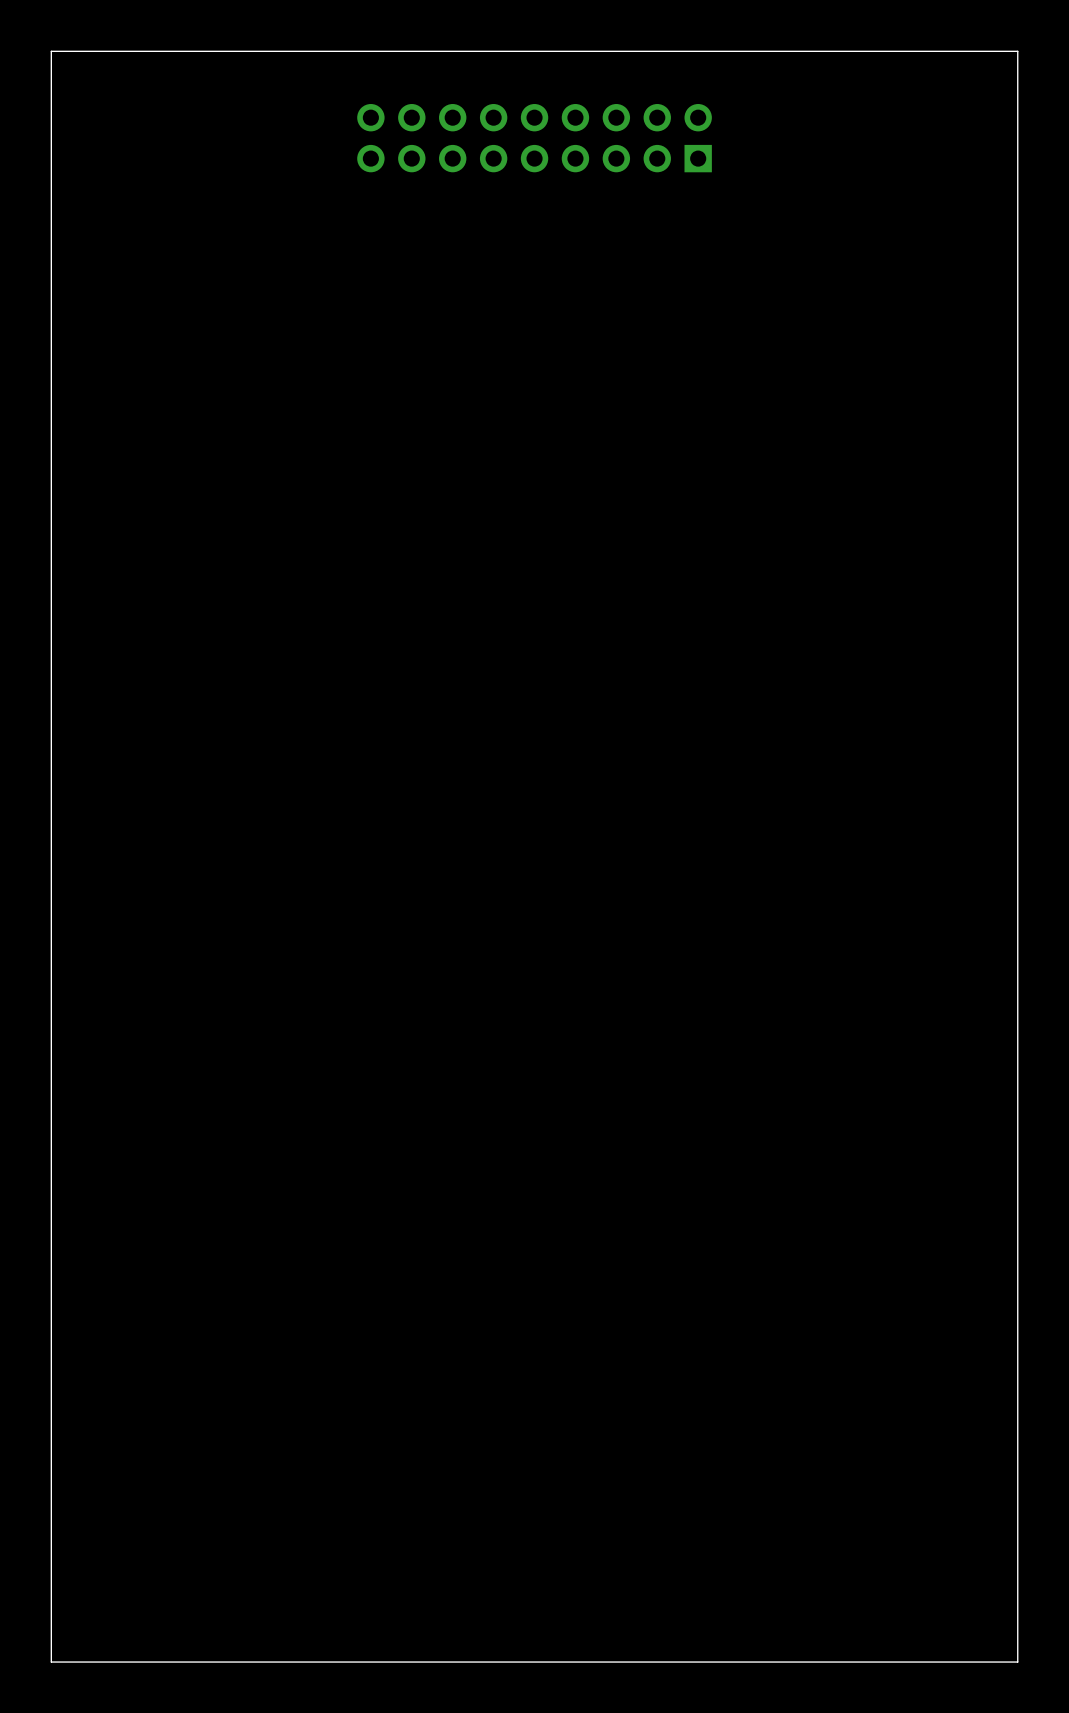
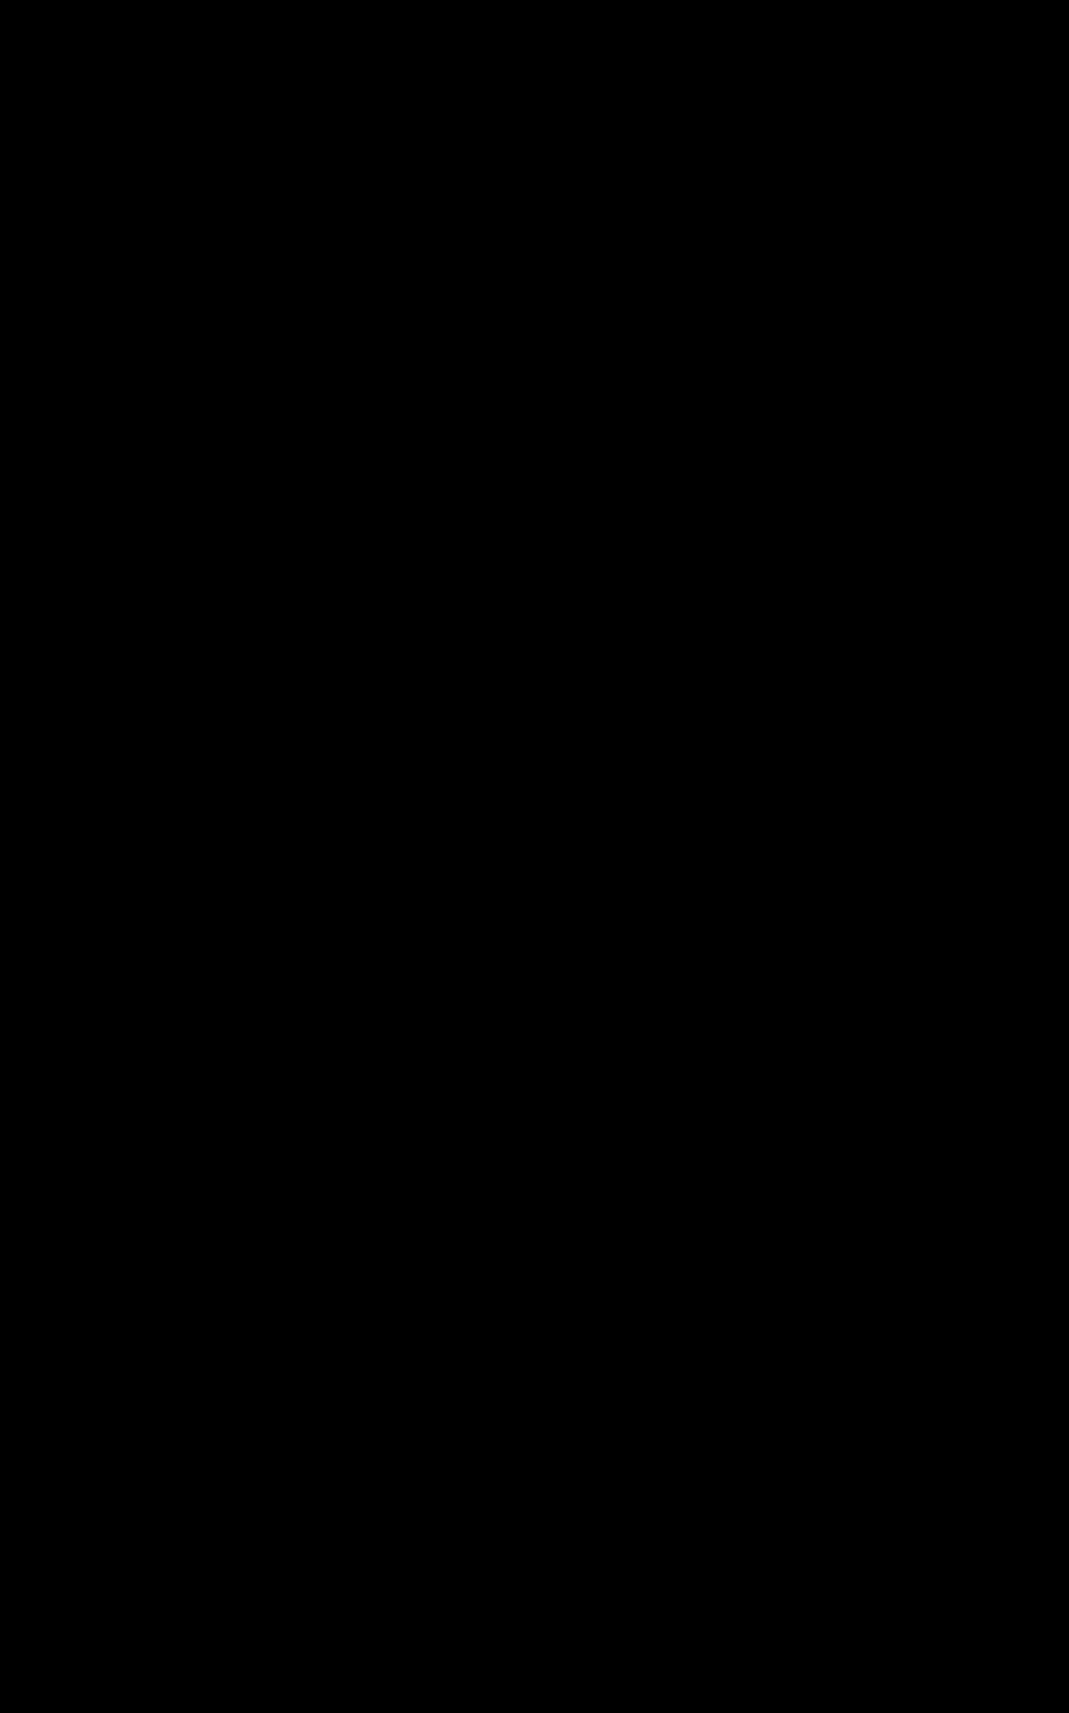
board edge: (1017, 51) (51, 51) (51, 1662) (1017, 1662) (1017, 51) -> none
part: (534, 138) -> none

